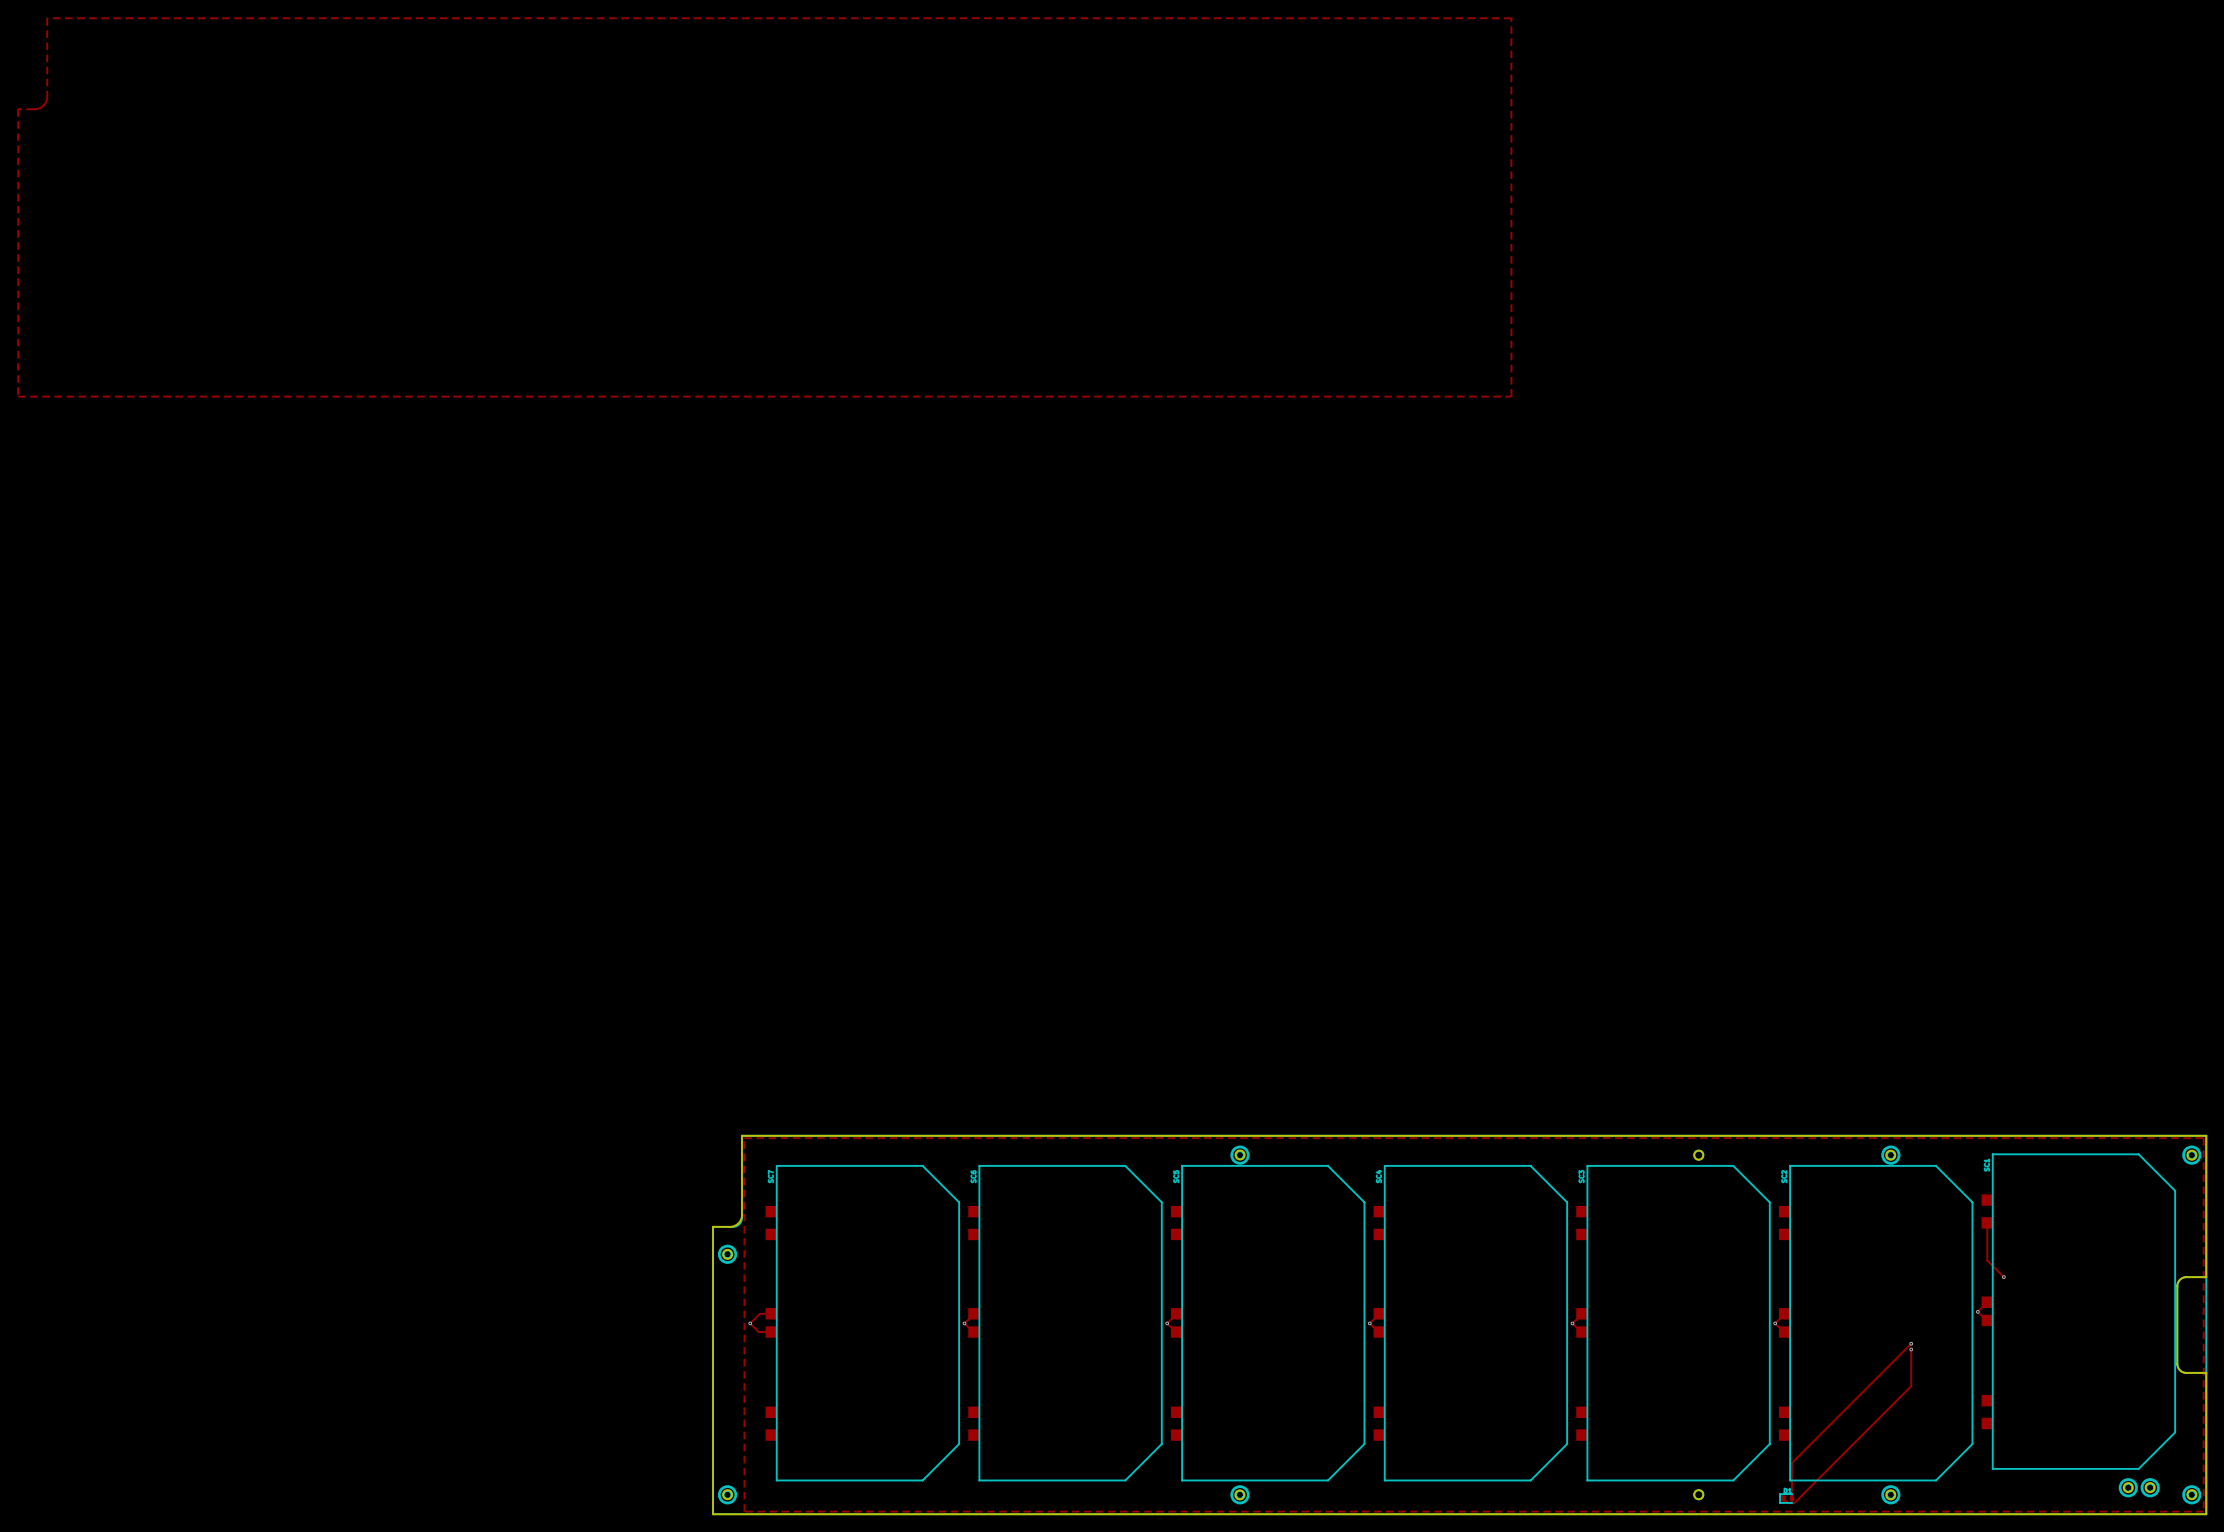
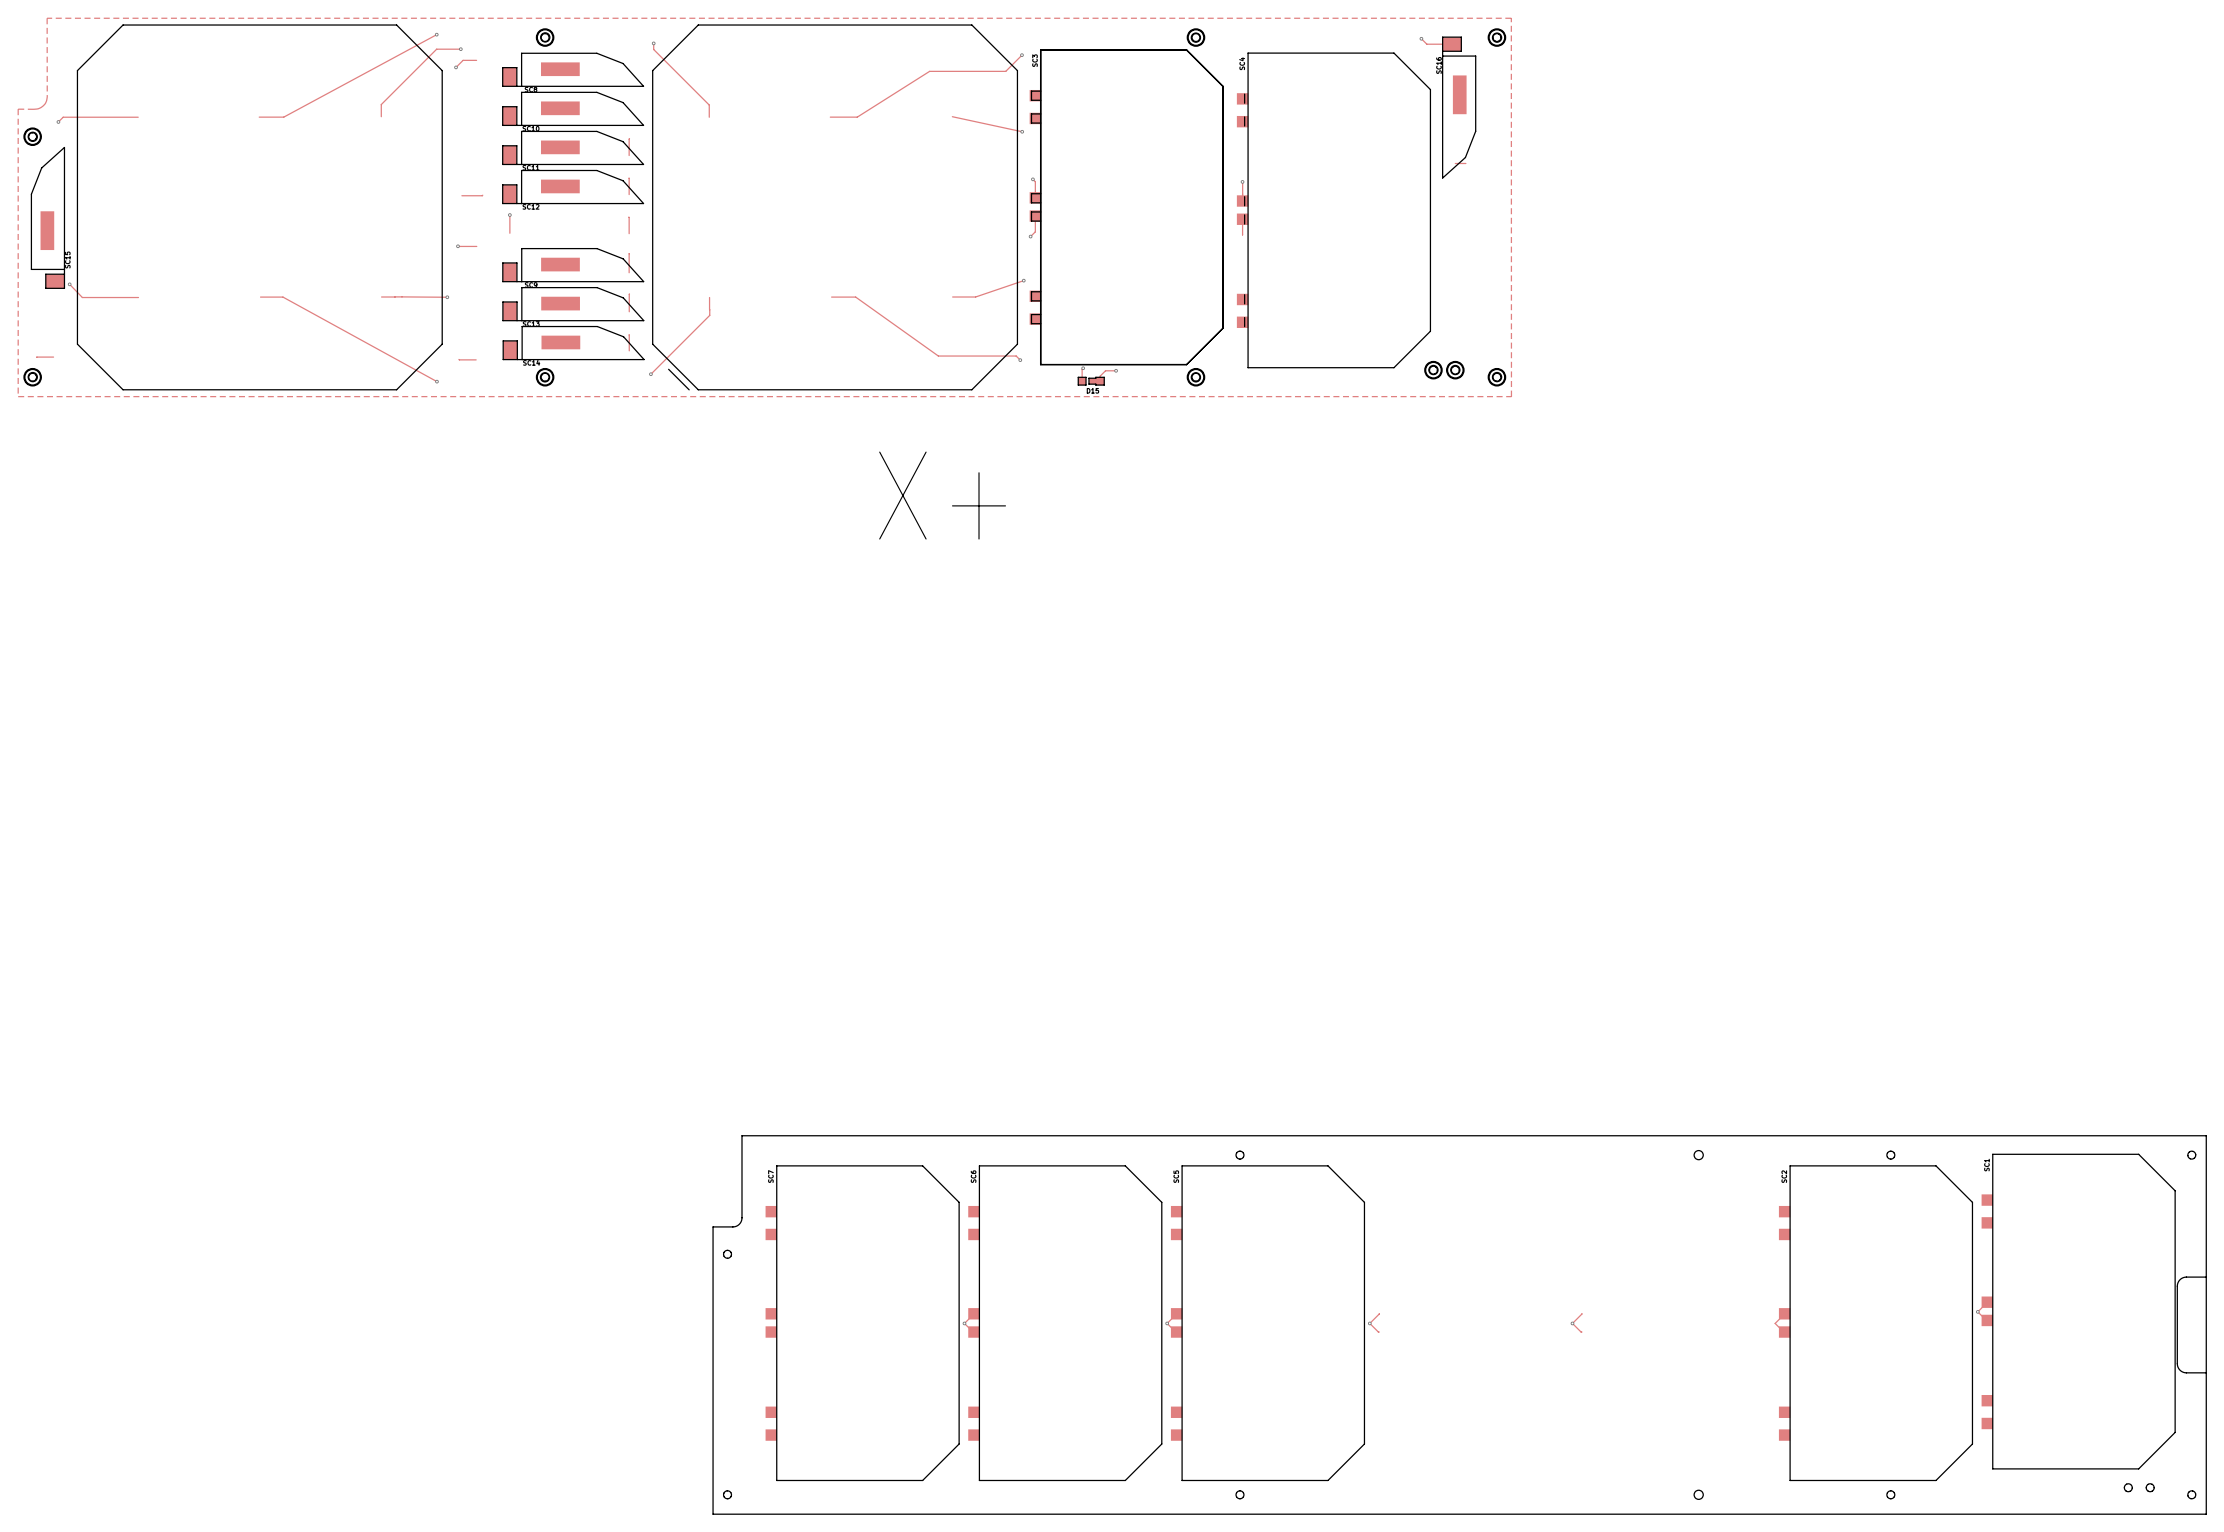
line: none -> (123, 25) (396, 25) (442, 70) (442, 344) (396, 389) (123, 389) (77, 344) (77, 70) (123, 25)
line: none -> (698, 25) (652, 70) (652, 344) (698, 389) (971, 389) (1017, 344) (1017, 70) (971, 25) (698, 25)
drawing: none -> [535, 28, 555, 47]
drawing: none -> [1186, 28, 1206, 47]
drawing: none -> [1487, 28, 1507, 47]
round board edge: none -> [540, 32, 551, 43]
round board edge: none -> [1190, 32, 1201, 43]
round board edge: none -> [1492, 32, 1502, 43]
line: none -> (545, 33) (549, 37) (545, 41) (541, 37) (545, 33)
line: none -> (1195, 33) (1199, 37) (1195, 41) (1192, 37) (1195, 33)
line: none -> (1498, 33) (1493, 36) (1495, 41) (1500, 39) (1500, 36) (1499, 34) (1498, 33)
track: none -> (436, 34) (283, 117) (259, 117)
via: none -> (436, 34)
track: none -> (1421, 38) (1426, 44) (1451, 44)
via: none -> (1421, 38)
track: none -> (653, 43) (653, 49) (709, 105) (709, 117)
via: none -> (653, 43)
track: none -> (460, 49) (436, 49) (381, 104) (381, 116)
via: none -> (460, 49)
line: none -> (1040, 50) (1186, 50) (1222, 86) (1222, 328) (1186, 364) (1040, 364) (1040, 50)
track: none -> (1021, 55) (1005, 71) (929, 71) (857, 117) (830, 117)
via: none -> (1021, 55)
track: none -> (476, 60) (463, 60) (456, 67)
via: none -> (456, 67)
part: none -> (573, 69)
line: none -> (1040, 91) (1031, 91) (1031, 100) (1040, 100)
line: none -> (1244, 94) (1244, 103)
part: none -> (1459, 107)
part: none -> (573, 108)
line: none -> (1040, 113) (1031, 113) (1031, 123) (1040, 123)
track: none -> (952, 116) (1022, 131)
line: none -> (1244, 116) (1244, 126)
track: none -> (138, 117) (63, 117) (58, 121)
via: none -> (58, 121)
drawing: none -> [23, 127, 42, 146]
round board edge: none -> [27, 131, 38, 142]
via: none -> (1022, 131)
line: none -> (32, 132) (36, 136) (32, 140) (28, 136) (32, 132)
track: none -> (629, 138) (629, 155)
part: none -> (573, 147)
track: none -> (1455, 163) (1465, 163)
track: none -> (628, 178) (629, 194)
track: none -> (1032, 179) (1035, 181) (1035, 197)
via: none -> (1032, 179)
track: none -> (1242, 181) (1242, 201)
via: none -> (1242, 181)
part: none -> (573, 187)
line: none -> (1040, 193) (1031, 193) (1031, 202) (1040, 202)
track: none -> (482, 195) (461, 195)
line: none -> (1244, 196) (1244, 205)
line: none -> (1040, 211) (1031, 211) (1031, 221) (1040, 221)
line: none -> (1244, 214) (1244, 224)
track: none -> (509, 215) (509, 233)
via: none -> (509, 215)
track: none -> (1035, 216) (1035, 231) (1030, 236)
part: none -> (47, 217)
track: none -> (628, 217) (629, 233)
track: none -> (1242, 219) (1242, 234)
via: none -> (1030, 236)
track: none -> (457, 246) (476, 246)
via: none -> (457, 246)
track: none -> (629, 253) (629, 272)
part: none -> (573, 265)
track: none -> (1023, 280) (975, 297) (952, 297)
via: none -> (1023, 280)
track: none -> (69, 284) (82, 297) (138, 297)
via: none -> (69, 284)
line: none -> (1040, 291) (1031, 291) (1031, 300) (1040, 300)
track: none -> (629, 294) (629, 311)
line: none -> (1244, 294) (1244, 303)
track: none -> (260, 297) (282, 297) (436, 381)
track: none -> (381, 297) (447, 297)
via: none -> (447, 297)
track: none -> (709, 297) (709, 315) (650, 374)
track: none -> (831, 297) (855, 297) (938, 356) (1016, 356) (1020, 360)
part: none -> (573, 304)
line: none -> (1040, 314) (1031, 314) (1031, 323) (1040, 323)
line: none -> (1244, 317) (1244, 326)
track: none -> (629, 334) (629, 350)
part: none -> (573, 343)
track: none -> (53, 357) (36, 357)
track: none -> (458, 359) (476, 359)
via: none -> (1020, 360)
drawing: none -> [1424, 361, 1465, 380]
round board edge: none -> [1428, 365, 1439, 375]
round board edge: none -> [1450, 365, 1461, 375]
line: none -> (1431, 366) (1429, 371) (1435, 373) (1437, 368) (1431, 366)
line: none -> (1453, 366) (1453, 366) (1454, 366) (1454, 366) (1456, 366) (1458, 368) (1457, 373) (1451, 372) (1451, 369) (1452, 367) (1452, 367) (1452, 367) (1453, 366)
drawing: none -> [23, 368, 42, 387]
drawing: none -> [535, 368, 555, 387]
track: none -> (1083, 368) (1082, 381)
via: none -> (1083, 368)
drawing: none -> [1186, 368, 1206, 387]
drawing: none -> [1487, 368, 1507, 387]
line: none -> (668, 369) (689, 389)
track: none -> (1116, 370) (1105, 370) (1100, 376) (1100, 381) (1092, 381)
via: none -> (1116, 370)
round board edge: none -> [27, 372, 38, 383]
round board edge: none -> [540, 372, 550, 383]
round board edge: none -> [1190, 372, 1201, 383]
round board edge: none -> [1492, 372, 1502, 383]
line: none -> (32, 373) (36, 376) (32, 381) (28, 377) (29, 374) (30, 373) (32, 373)
line: none -> (545, 373) (549, 377) (545, 381) (541, 377) (545, 373)
line: none -> (1195, 373) (1199, 377) (1195, 381) (1192, 377) (1195, 373)
line: none -> (1497, 373) (1493, 376) (1496, 381) (1500, 378) (1497, 373)
via: none -> (650, 374)
via: none -> (436, 381)
part: none -> (1091, 381)
text: none -> X+ (942, 495)
board edge: (742, 1135) (2206, 1135) (2206, 1277) (2183, 1277) (2179, 1280) (2177, 1286) (2177, 1366) (2183, 1372) (2206, 1372) (2206, 1514) (713, 1514) (713, 1226) (732, 1226) (738, 1223) (741, 1217) (742, 1135) -> none
zone outline: (744, 1138) (744, 1511) (2203, 1511) (2203, 1138) (744, 1138) -> none
drawing: [1230, 1146, 1250, 1165] -> none
drawing: [1881, 1146, 1900, 1165] -> none
drawing: [2182, 1146, 2201, 1165] -> none
round board edge: [1235, 1150, 1246, 1160] -> none
round board edge: [1693, 1150, 1704, 1161] -> none
round board edge: [1885, 1150, 1896, 1161] -> none
round board edge: [2186, 1150, 2197, 1161] -> none
track: (1987, 1222) (1987, 1260) (2003, 1277) -> none
drawing: [718, 1245, 737, 1264] -> none
round board edge: [722, 1249, 733, 1260] -> none
via: (2003, 1277) -> none
track: (771, 1313) (759, 1313) (750, 1323) (758, 1332) (771, 1332) -> none
via: (750, 1323) -> none
part position: (1470, 1323) -> (1333, 210)
part position: (1673, 1323) -> (1126, 207)
via: (1775, 1323) -> none
track: (1911, 1343) (1791, 1462) (1791, 1498) -> none
via: (1911, 1343) -> none
track: (1911, 1349) (1911, 1386) (1794, 1503) (1788, 1503) (1783, 1498) -> none
via: (1911, 1349) -> none
drawing: [2119, 1478, 2160, 1497] -> none
round board edge: [2123, 1482, 2134, 1493] -> none
round board edge: [2145, 1482, 2156, 1493] -> none
drawing: [718, 1485, 737, 1504] -> none
drawing: [1230, 1485, 1250, 1504] -> none
drawing: [1881, 1485, 1900, 1504] -> none
drawing: [2182, 1485, 2201, 1504] -> none
round board edge: [722, 1489, 733, 1500] -> none
round board edge: [1234, 1489, 1245, 1500] -> none
round board edge: [1693, 1489, 1704, 1500] -> none
round board edge: [1885, 1489, 1896, 1500] -> none
round board edge: [2186, 1489, 2197, 1500] -> none
part: (1786, 1498) -> none

